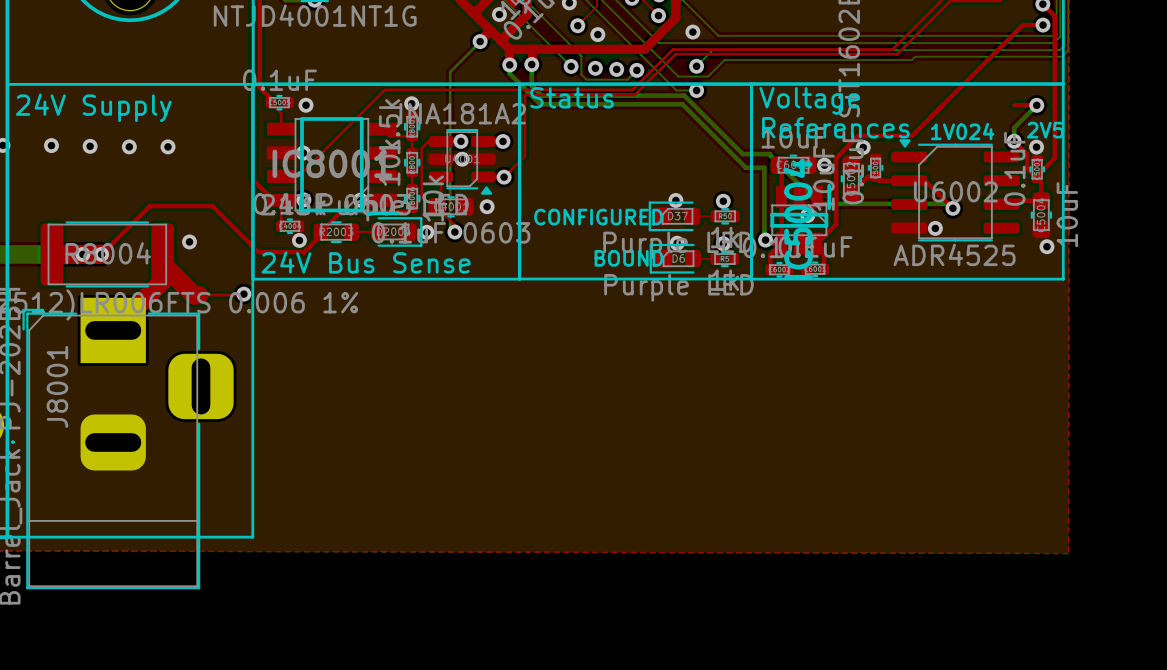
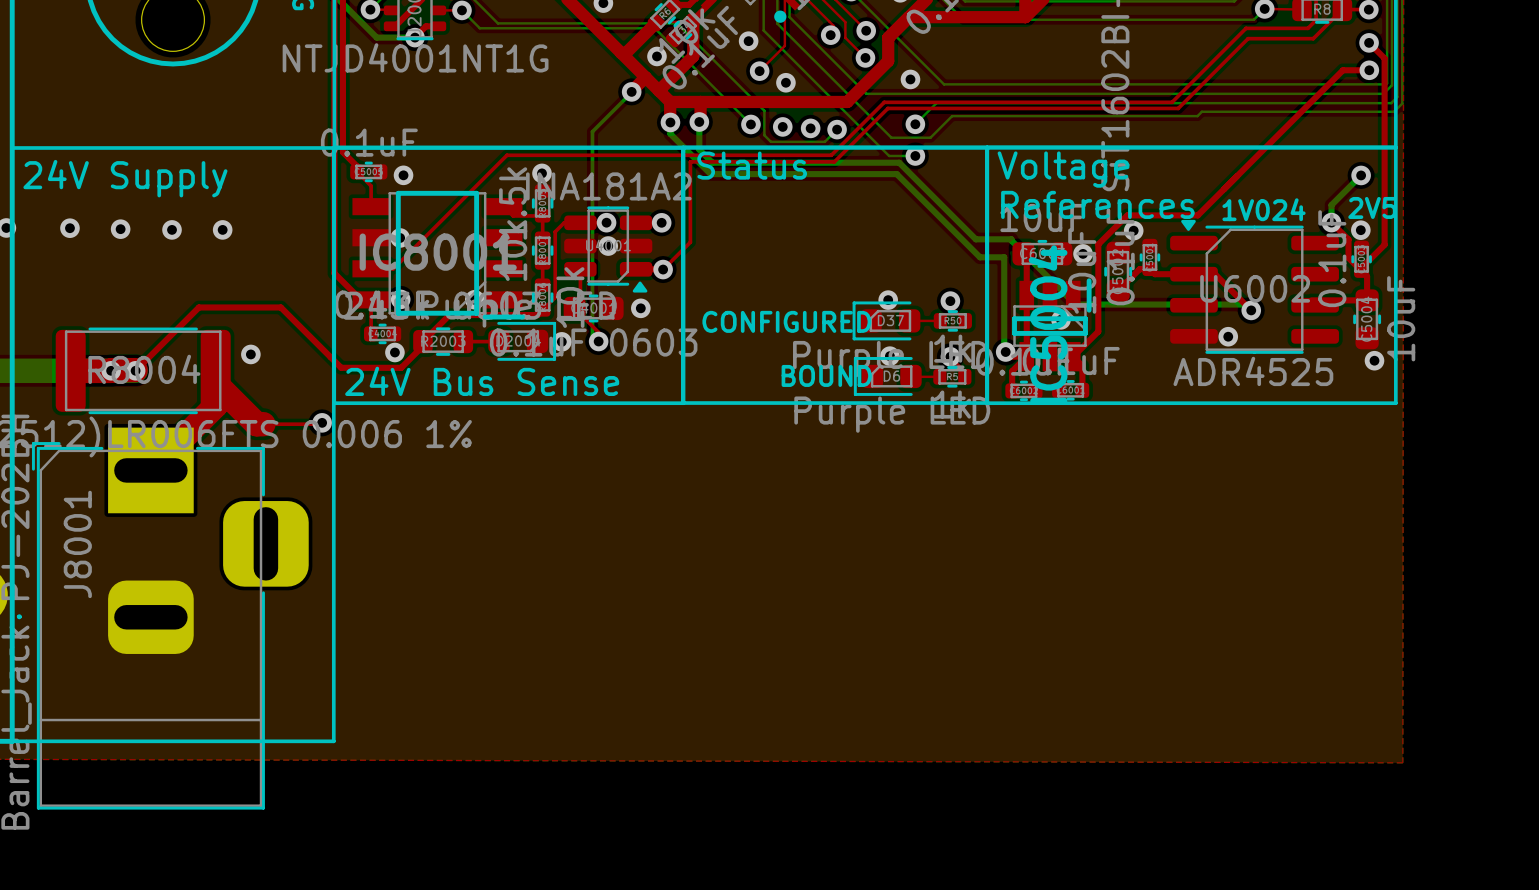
top track: (1014, 105) (1036, 105) -> none

